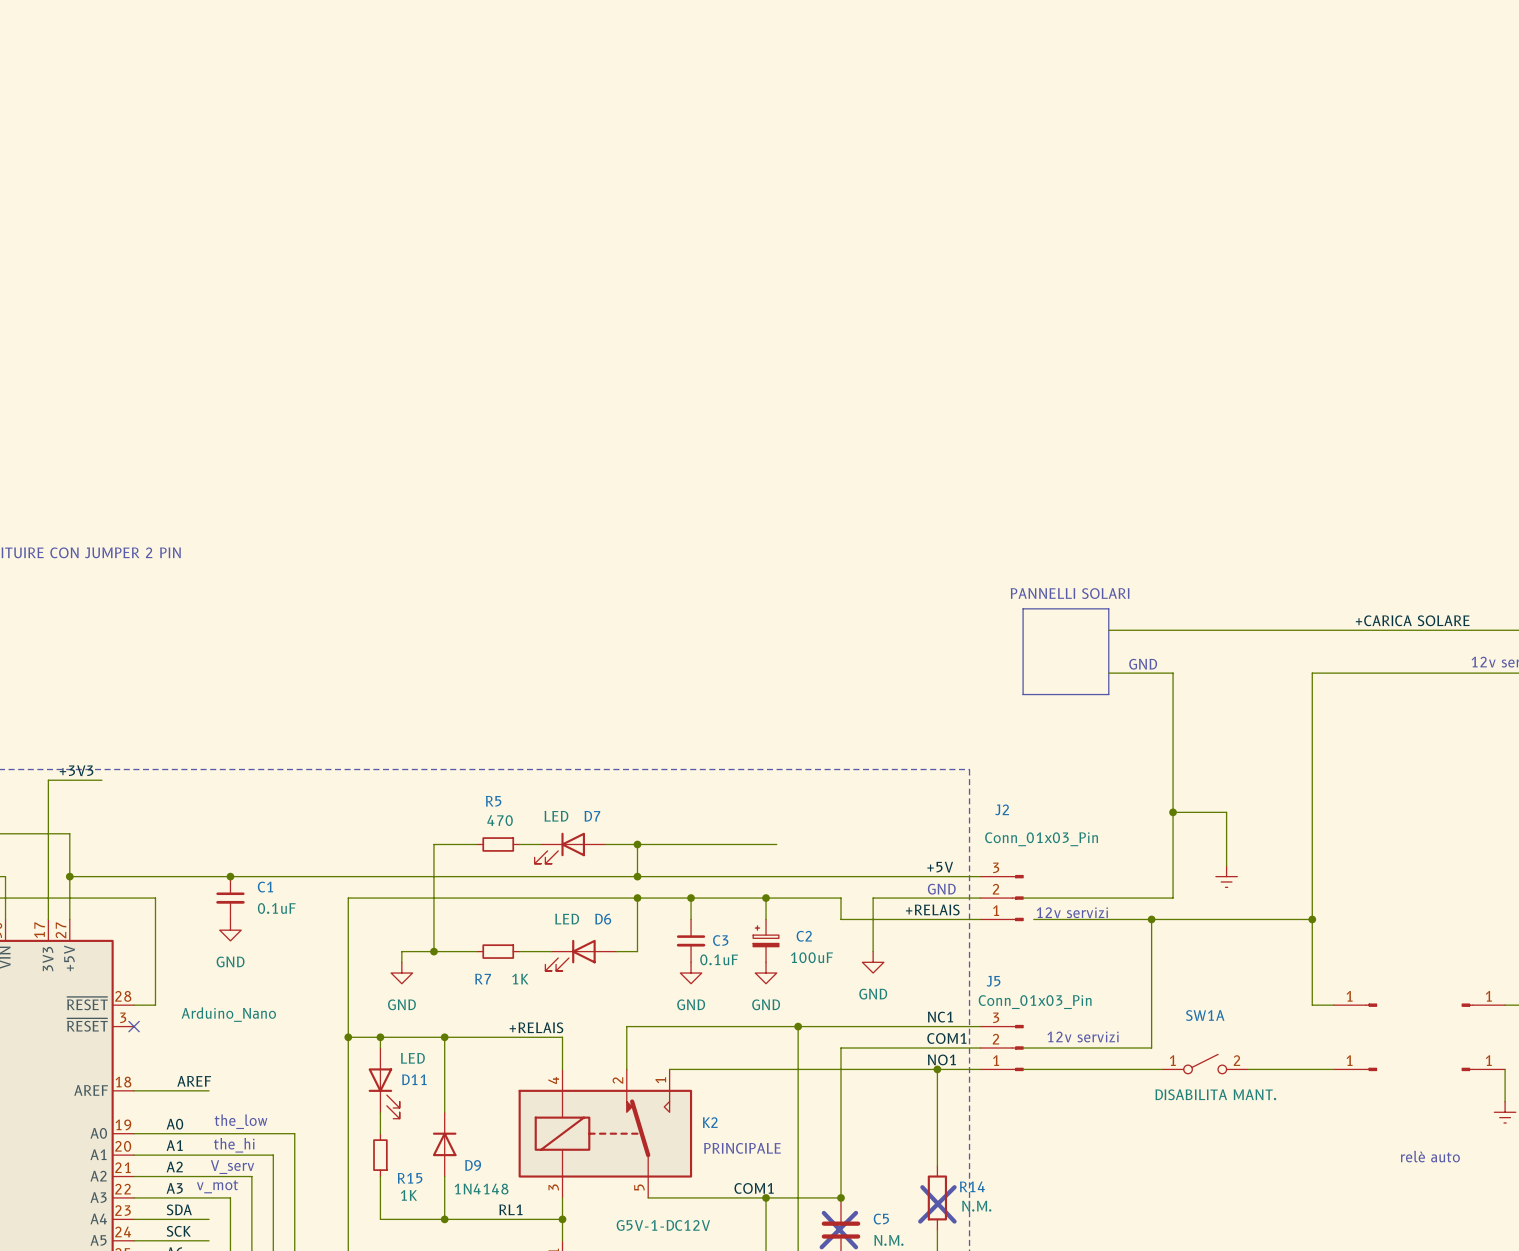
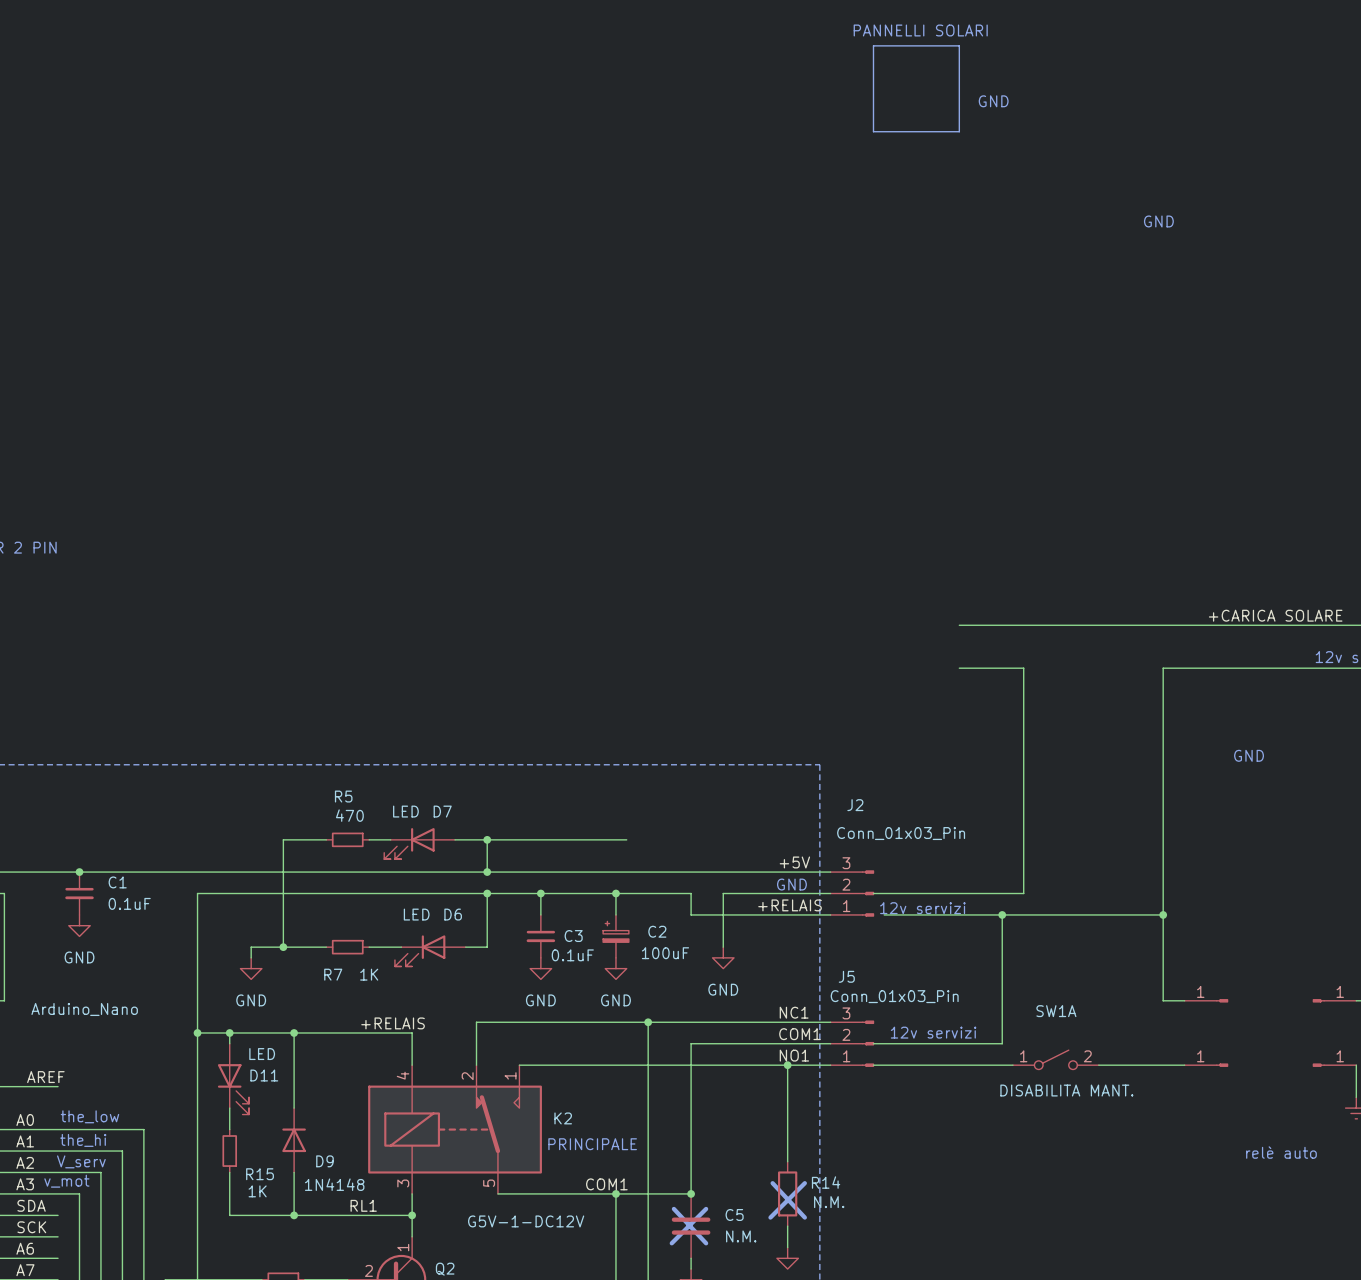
text: none -> PANNELLI SOLARI (920, 30)
line: none -> (873, 45) (959, 45) (959, 131) (873, 131) (873, 45)
text: none -> GND (993, 101)
text: none -> GND (1158, 221)
text: PANNELLI SOLARI (1070, 593) -> none
line: (1023, 608) (1108, 608) (1108, 694) (1023, 694) (1023, 608) -> none
text: GND (1143, 664) -> none
text: none -> GND (1249, 755)
wire: (1173, 812) (1226, 812) (1226, 865) -> none
junction: (1173, 812) -> none
power symbol: (1226, 876) -> none

